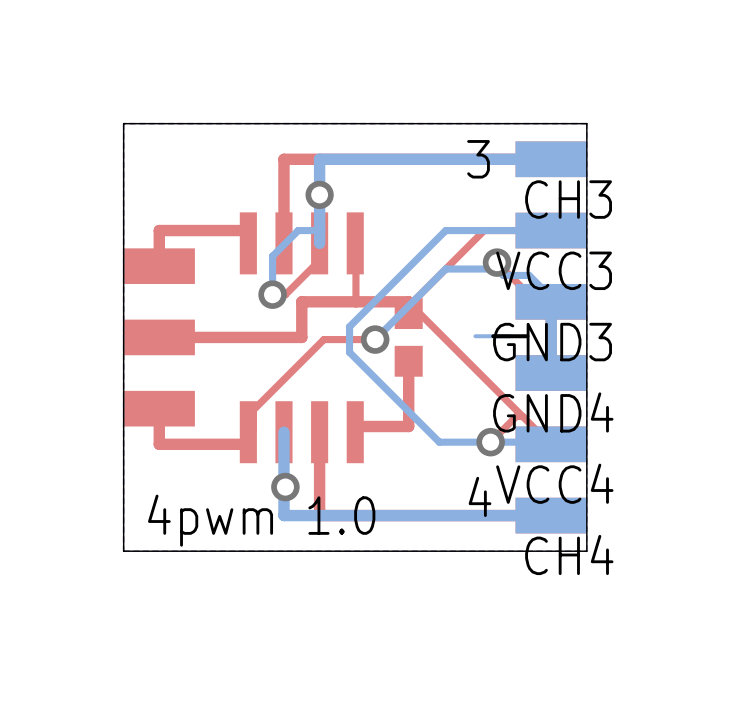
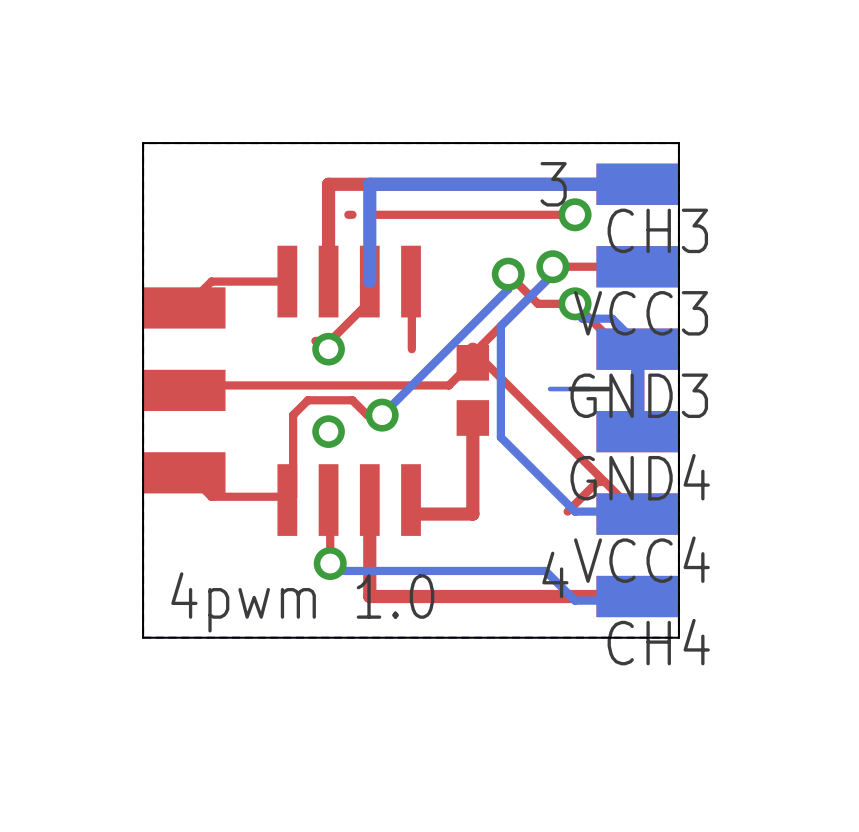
top track: none -> (352, 214) (348, 214)
top track: none -> (575, 214) (369, 214)
via: none -> (575, 214)
via: (319, 194) -> none
bottom track: (319, 230) (298, 230) (272, 256) (272, 294) -> none
via: none -> (552, 266)
bottom track: (548, 230) (445, 230) (349, 326) (349, 352) (439, 442) (497, 442) -> (500, 326) (500, 437) (575, 511)
top track: none -> (508, 274) (537, 303) (575, 303)
bottom track: none -> (508, 274) (508, 288) (382, 415)
via: none -> (508, 274)
top track: (248, 243) (248, 230) (159, 230) (159, 266) -> (287, 281) (211, 281) (184, 307)
bottom track: (497, 269) (445, 269) -> (552, 266) (552, 274) (515, 311)
bottom track: (432, 281) (375, 339) -> none
via position: (272, 294) -> (328, 349)
top track: (408, 301) (301, 301) (301, 337) (159, 337) -> (472, 362) (448, 385) (189, 385) (184, 390)
top track: (375, 339) (323, 339) (253, 410) -> (382, 415) (367, 415) (352, 400) (307, 400) (293, 415) (293, 474)
via: (375, 339) -> none
via: none -> (382, 415)
via: none -> (328, 431)
top track: (159, 408) (159, 444) (248, 444) (248, 432) -> (184, 472) (189, 474) (211, 496) (285, 496) (287, 500)
top track: (408, 426) (355, 426) (355, 432) -> (472, 493) (472, 514) (411, 514) (411, 500)
bottom track: (283, 432) (283, 515) (551, 515) -> (337, 570) (545, 570) (575, 600) (634, 600) (637, 596)
via: (490, 442) -> none

